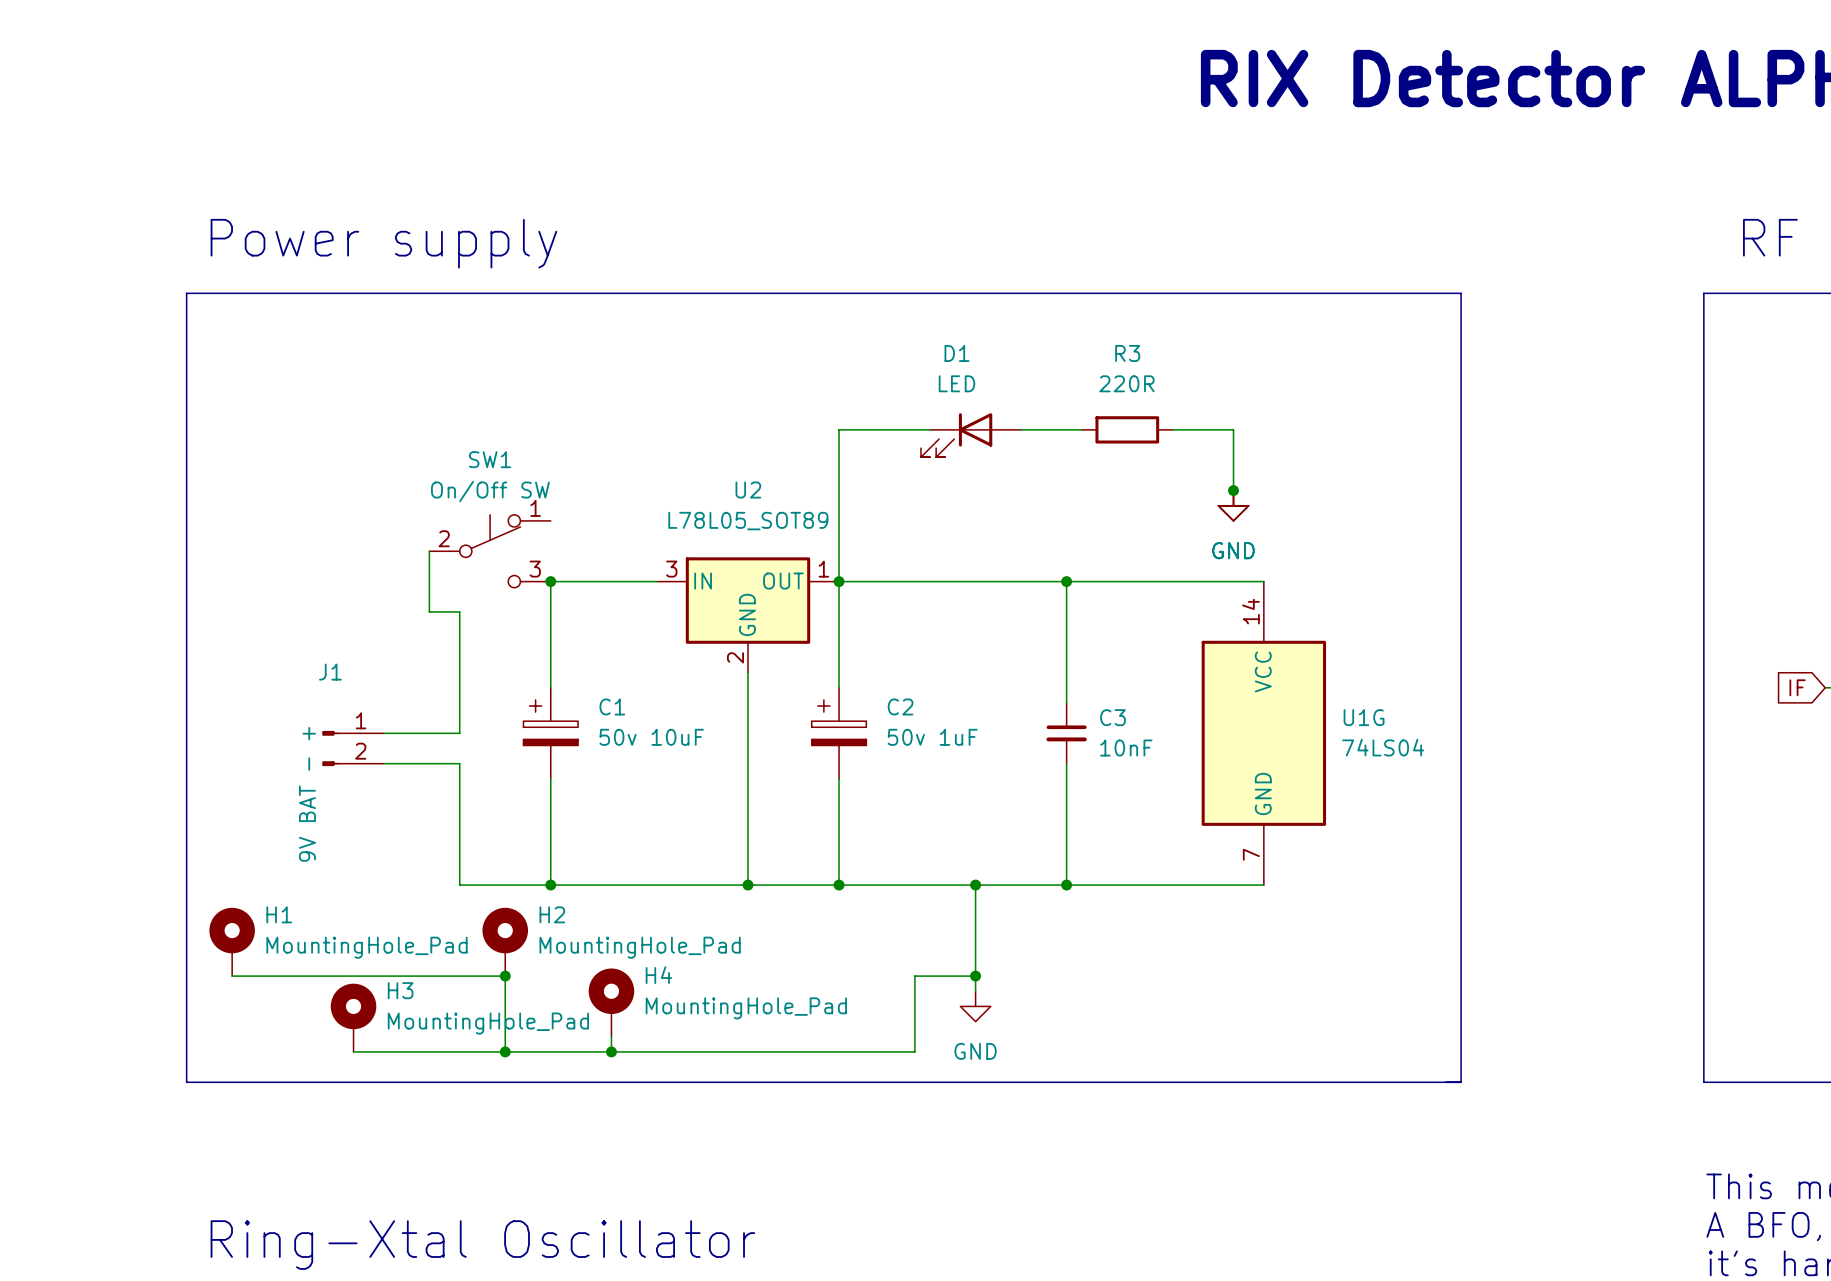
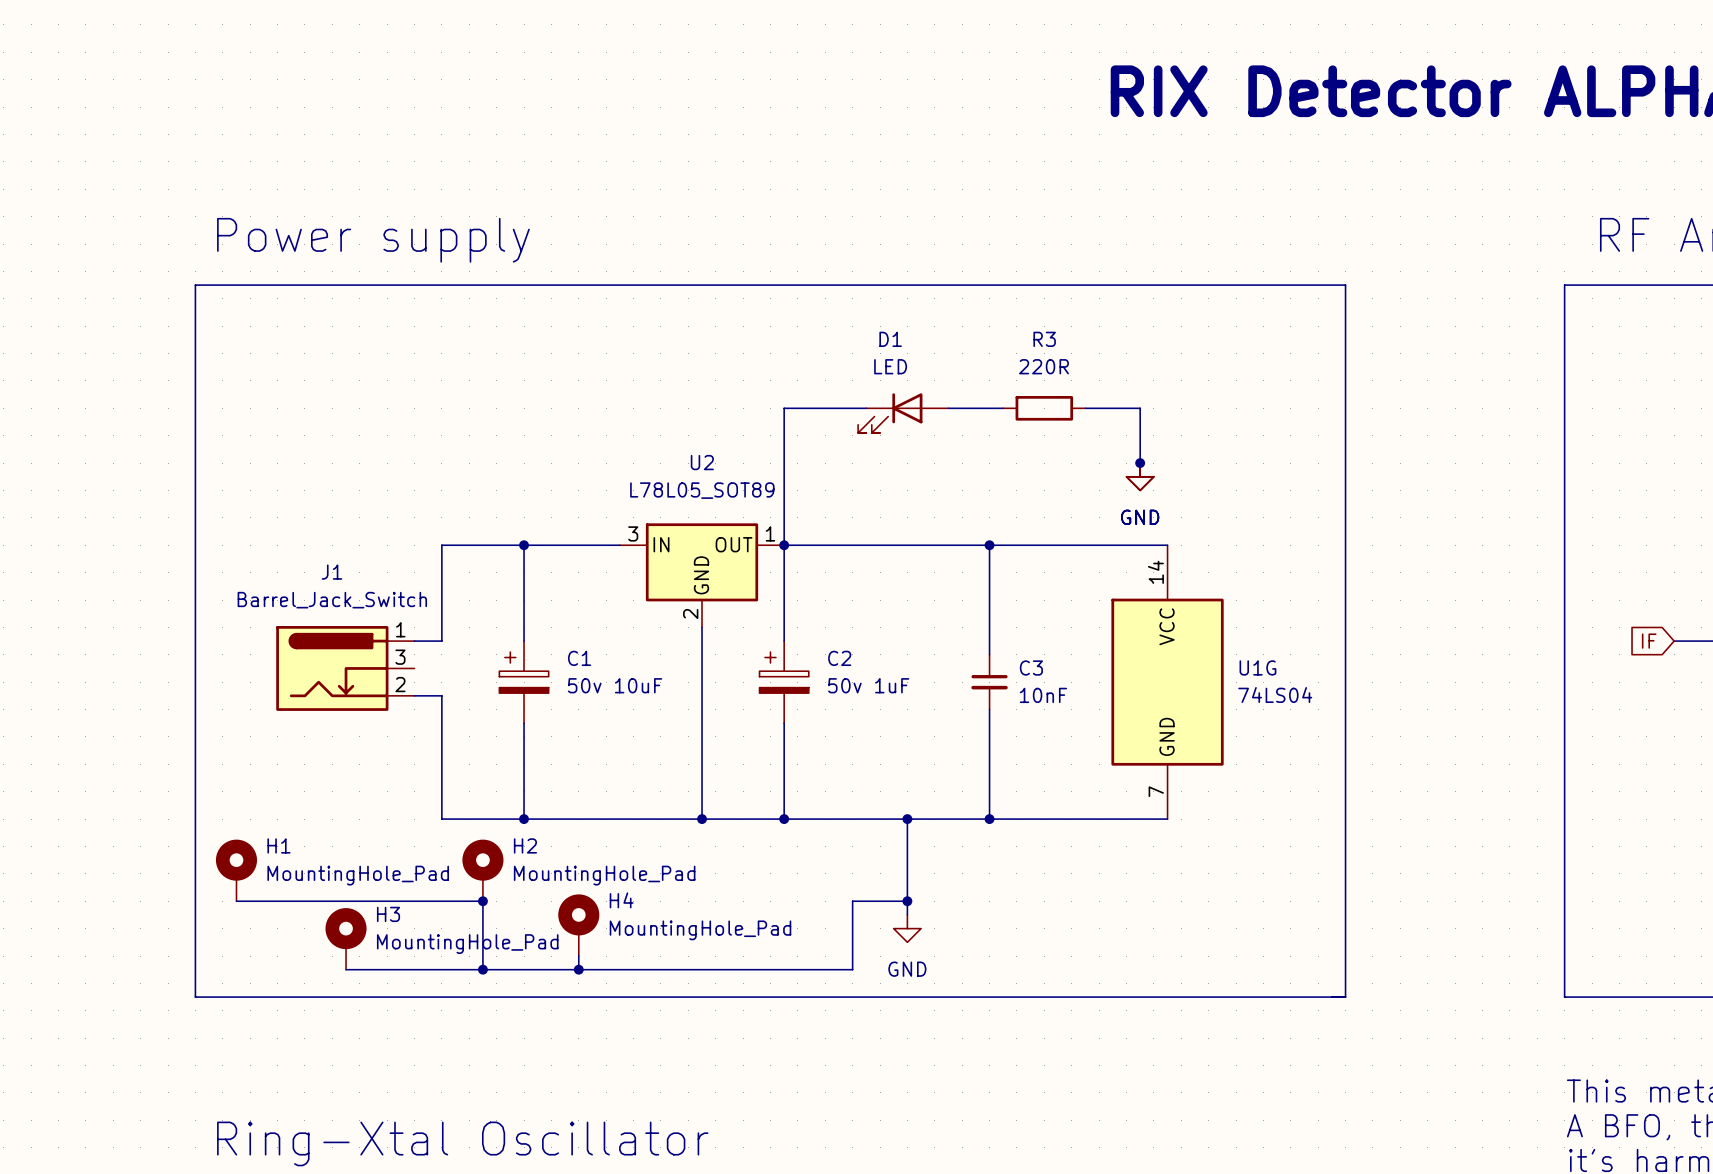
wire: (429, 551) (429, 611) (459, 611) -> (524, 545) (441, 545) (441, 572)
SW1: On/Off SW (490, 551) -> none
J1 name position: J1 (330, 672) -> J1 (332, 572)
wire: (459, 687) (459, 733) (383, 733) -> (441, 641) (414, 641)
J1 symbol: [322, 730, 384, 767] -> [276, 626, 415, 711]
wire: (383, 763) (459, 763) -> (414, 695) (441, 695) (441, 709)
J1 value: 9V BAT - + (307, 794) -> Barrel_Jack_Switch (332, 600)

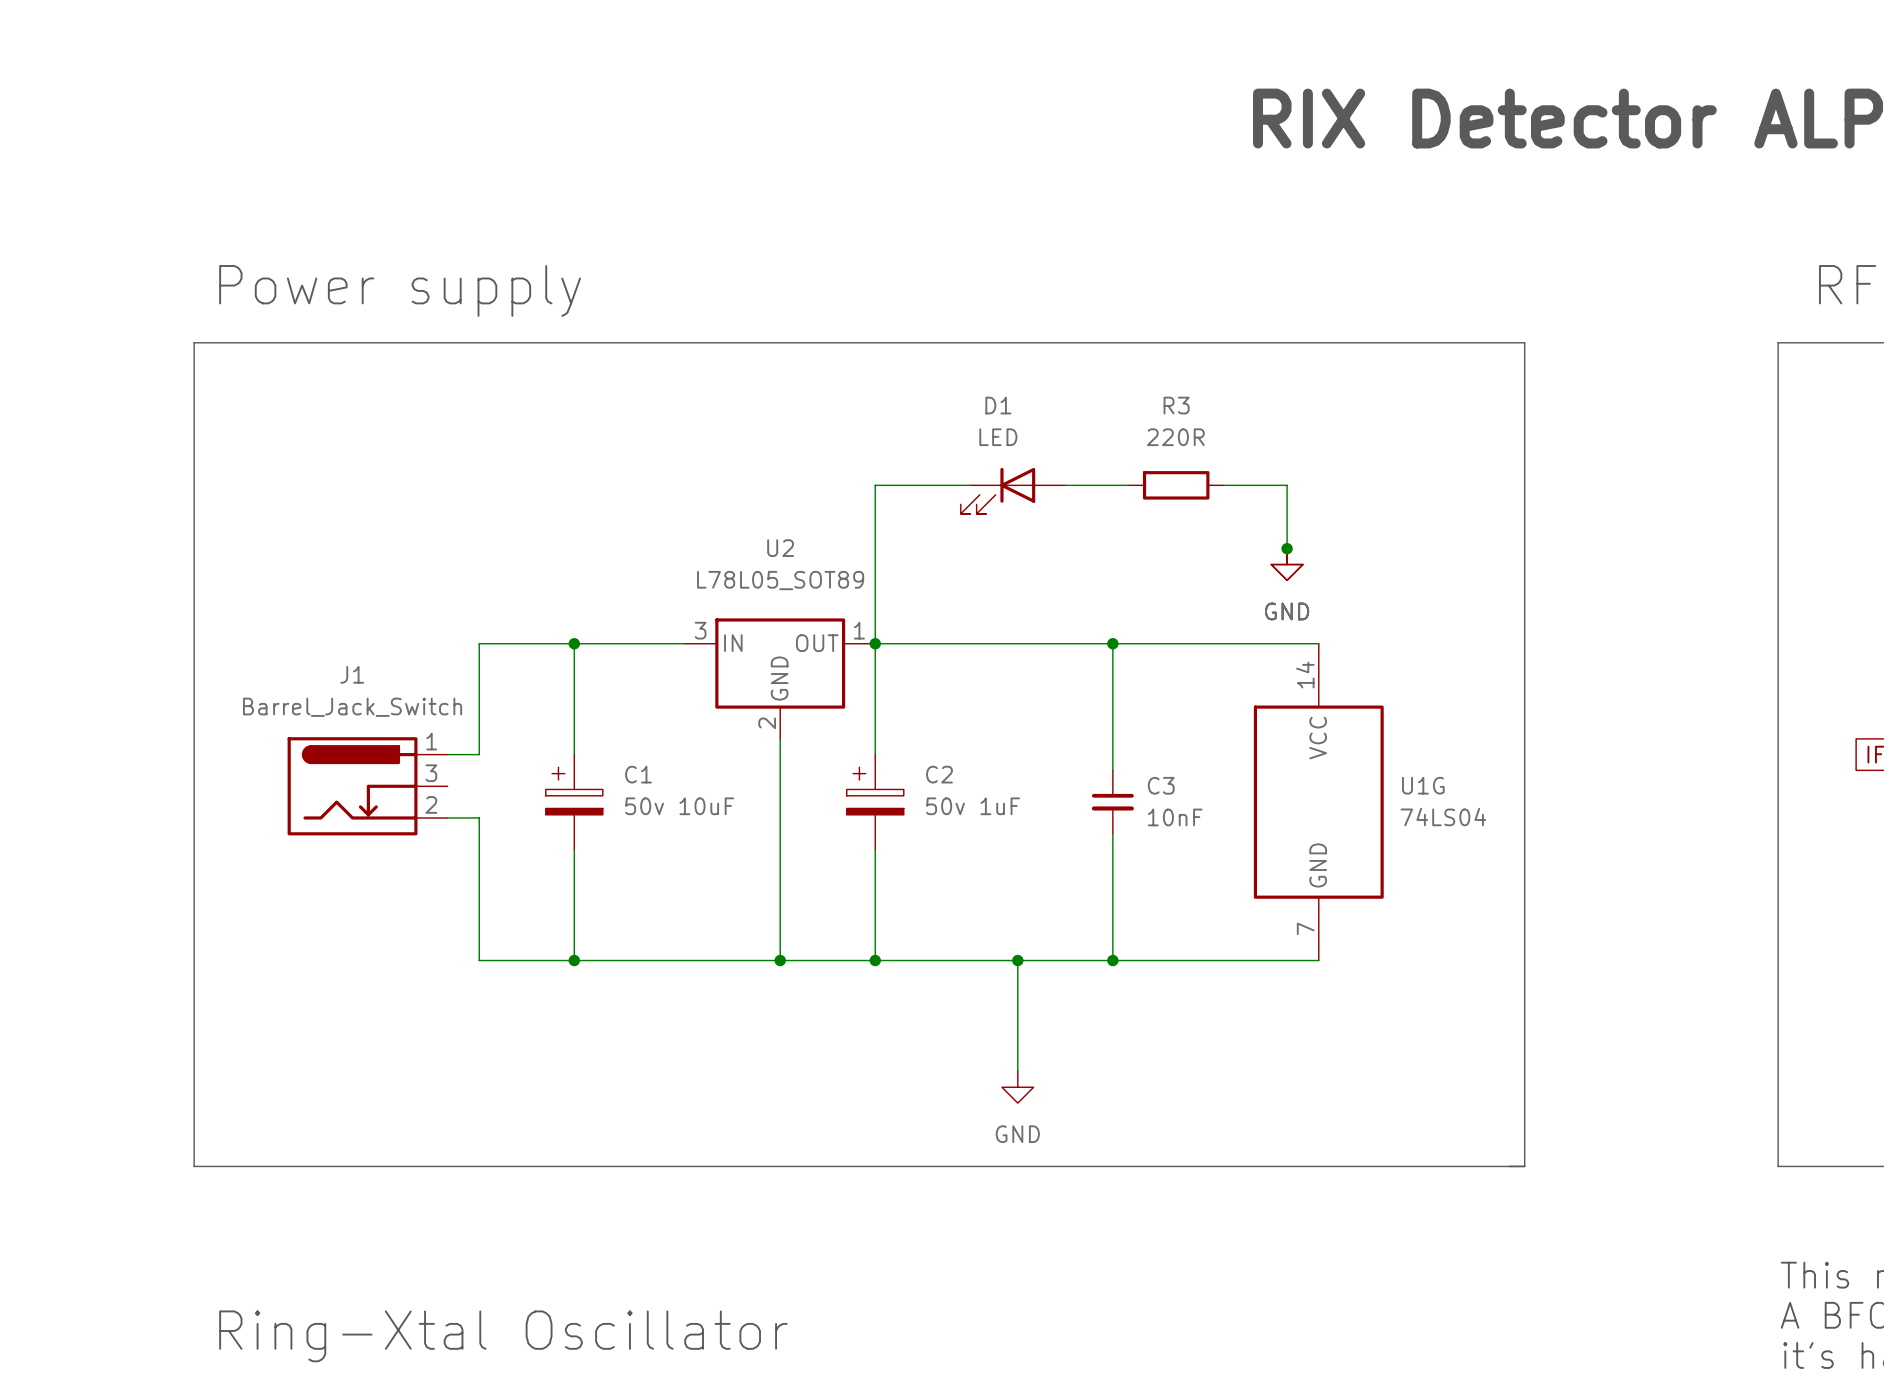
H1: MountingHole_Pad (236, 870) -> none
H2: MountingHole_Pad (482, 870) -> none
wire: (236, 901) (482, 901) (482, 969) -> none
junction: (482, 901) -> none
wire: (907, 901) (852, 901) (852, 969) (346, 969) -> none
junction: (907, 901) -> none
H4: MountingHole_Pad (578, 925) -> none
H3: MountingHole_Pad (346, 938) -> none
wire: (578, 956) (578, 969) -> none
junction: (482, 969) -> none
junction: (578, 969) -> none

